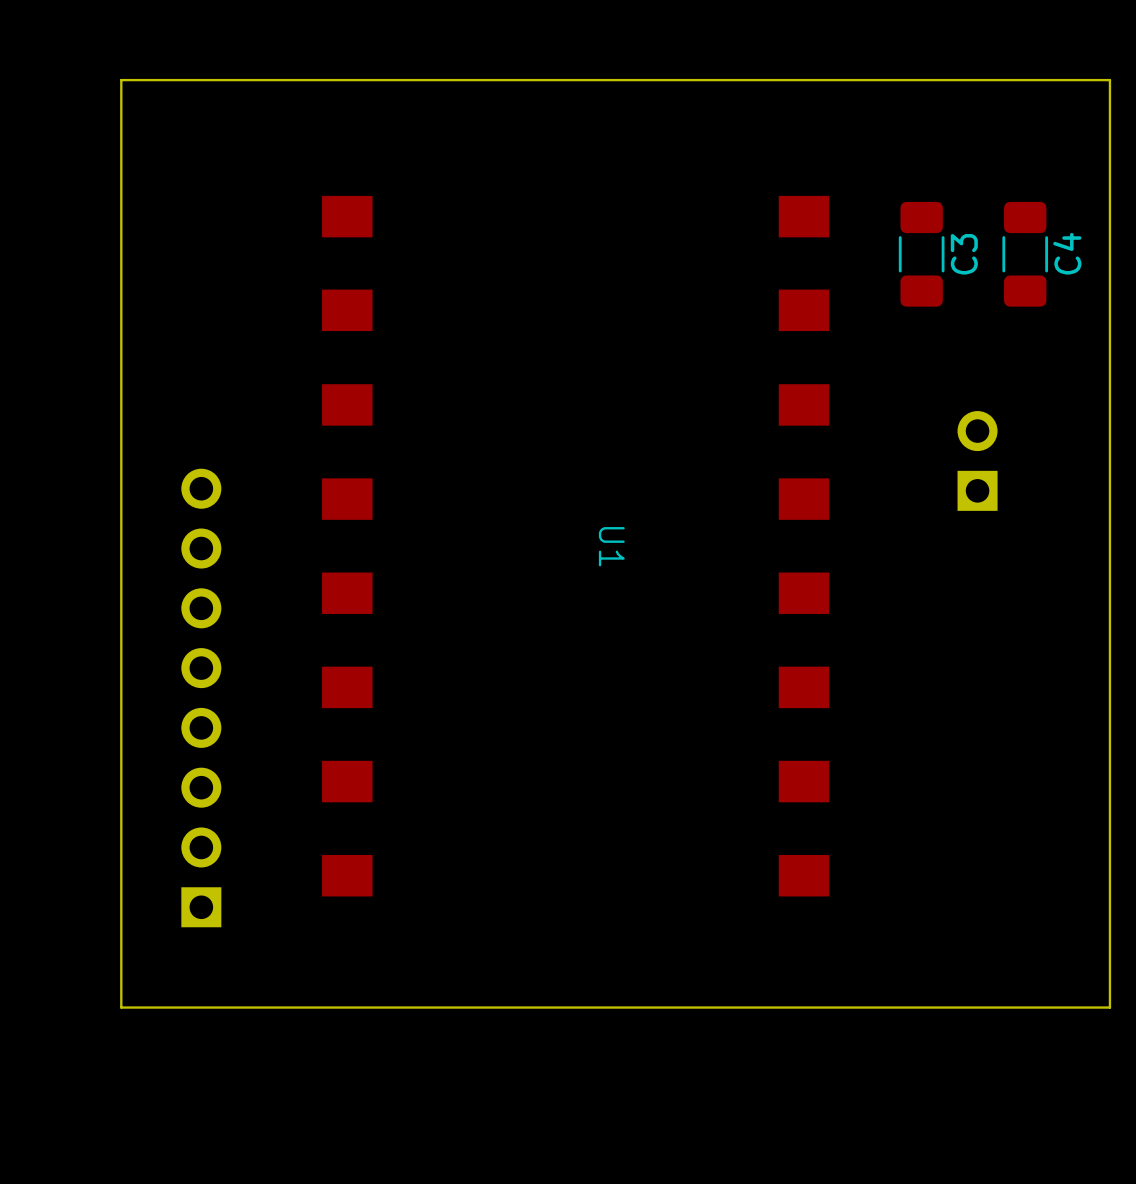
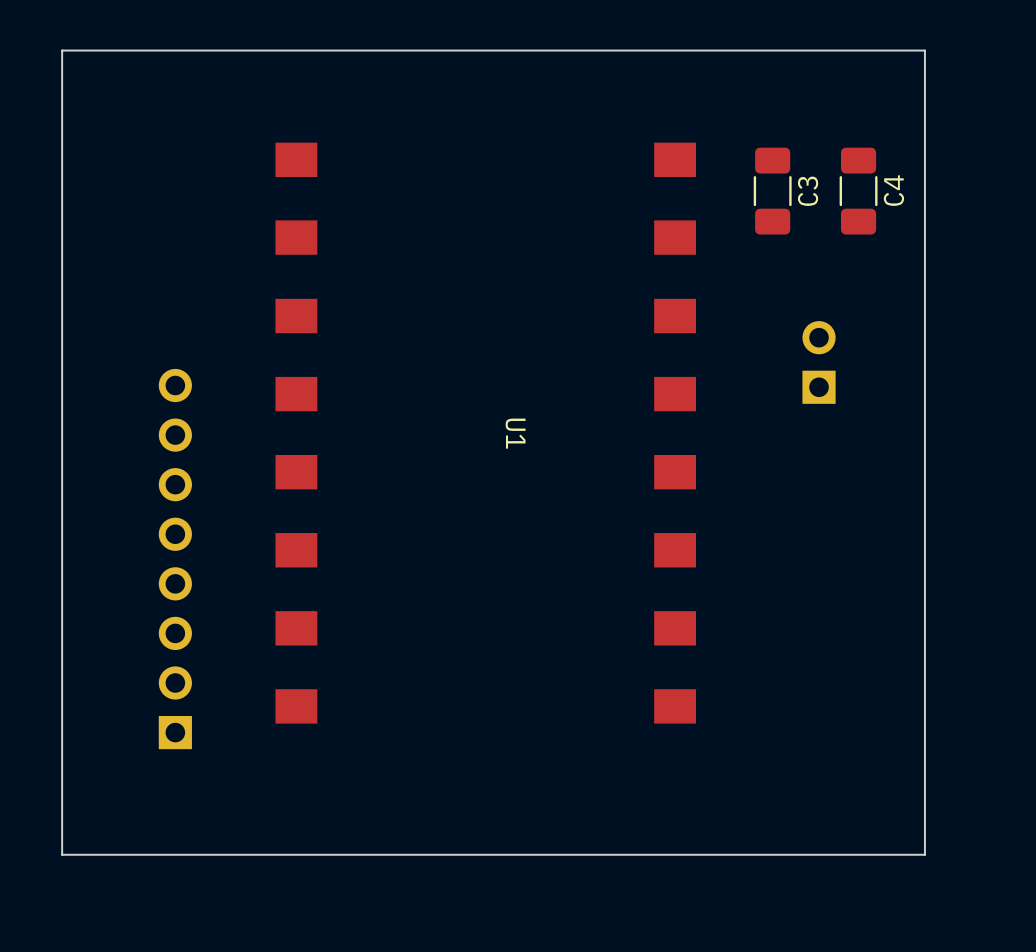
board edge: (121, 80) (1109, 80) (1109, 1007) (121, 1007) (121, 80) -> (62, 50) (62, 854) (924, 854) (924, 50) (62, 50)

